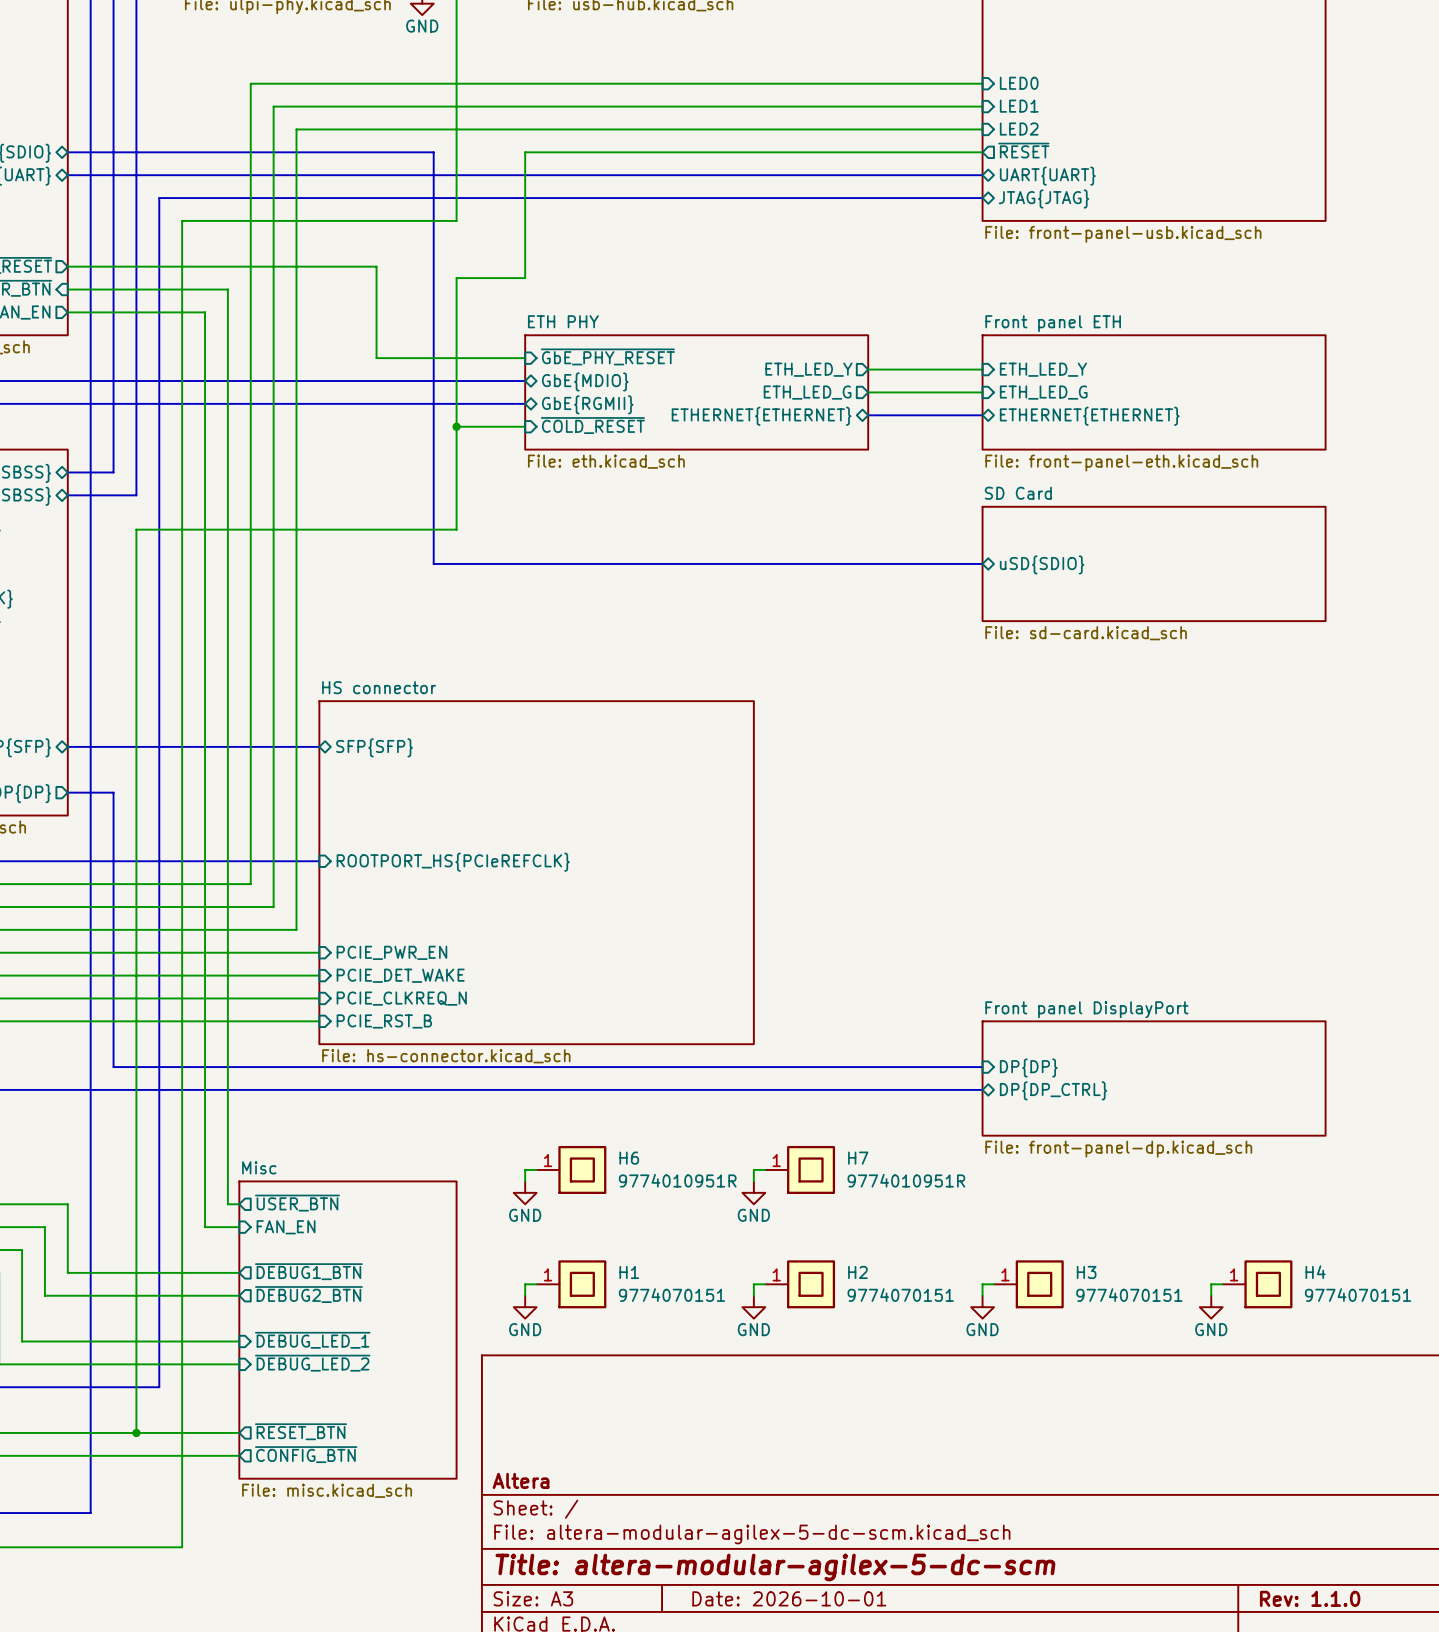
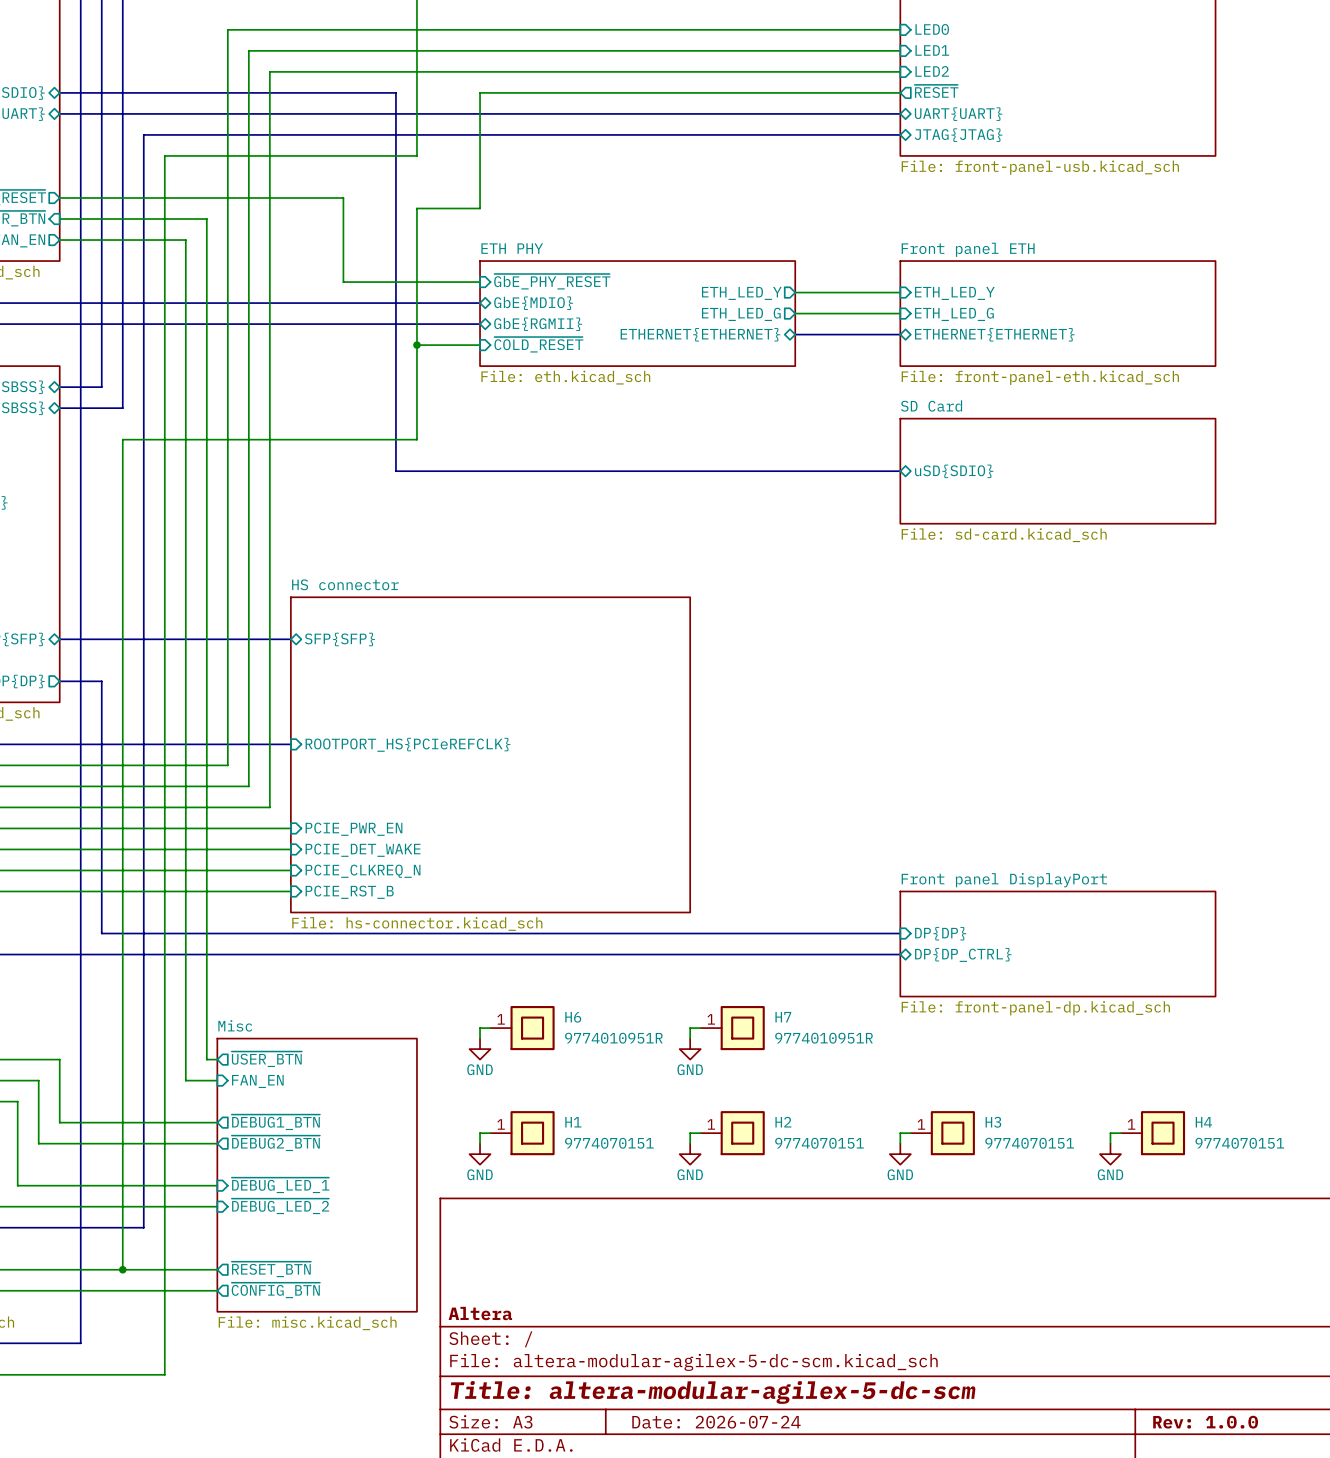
title block: Date: 2026-10-01 (789, 1598) -> Date: 2026-07-24 (716, 1422)
title block: Rev: 1.1.0 (1310, 1598) -> Rev: 1.0.0 (1205, 1422)

